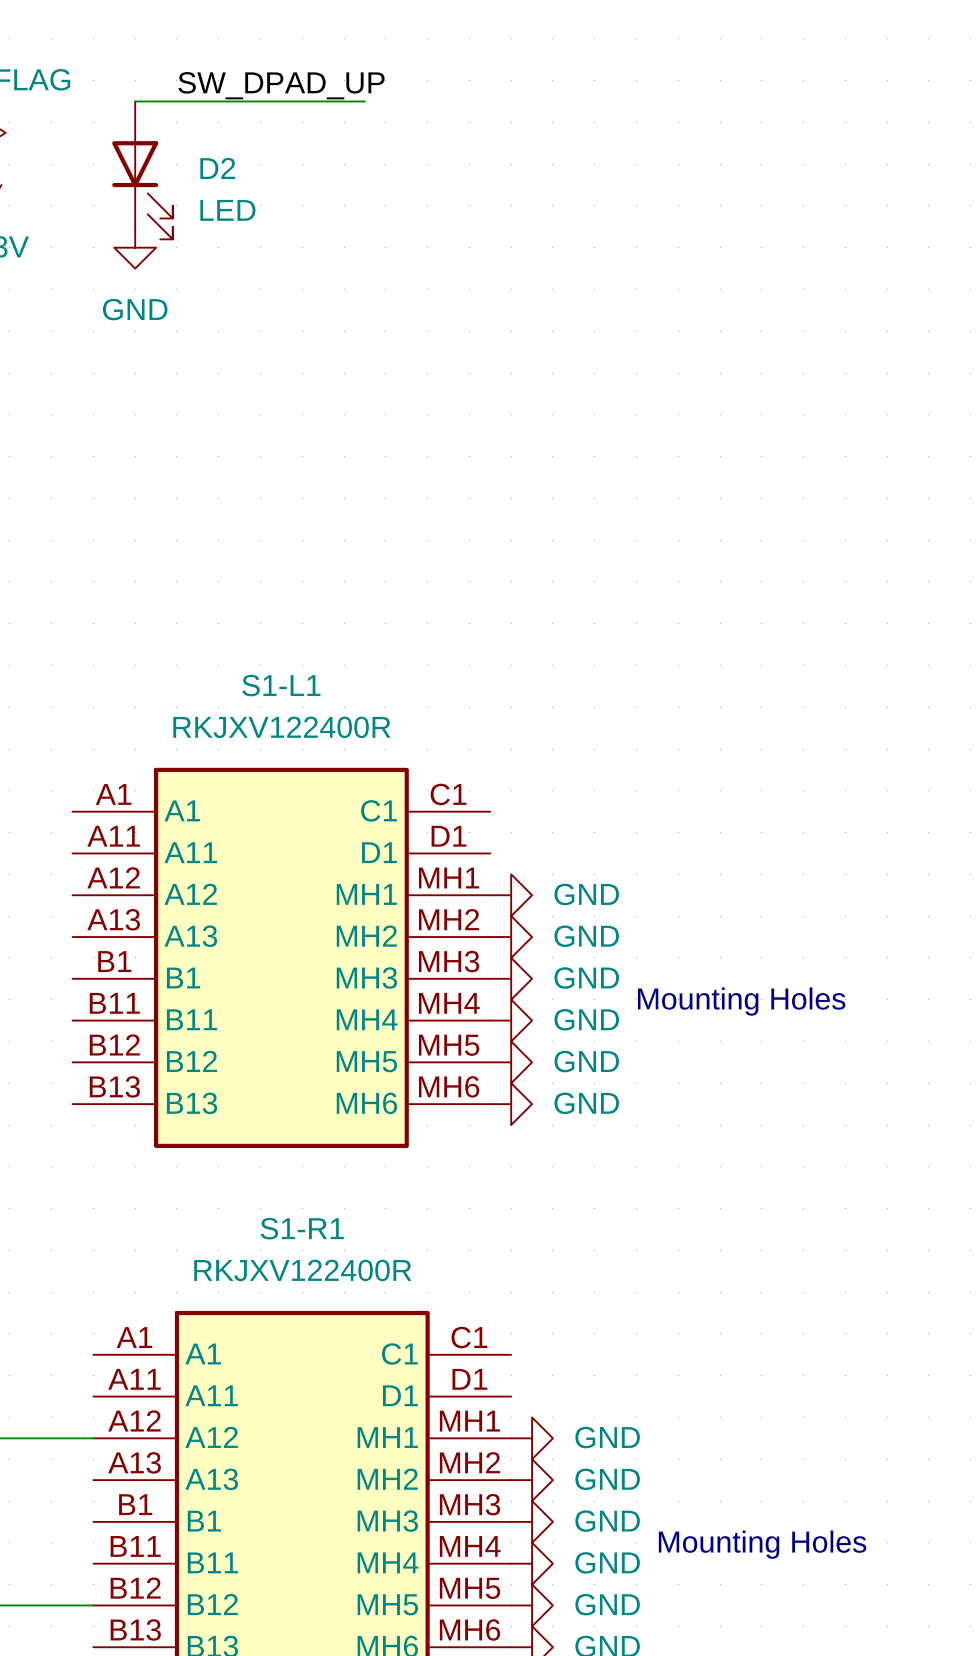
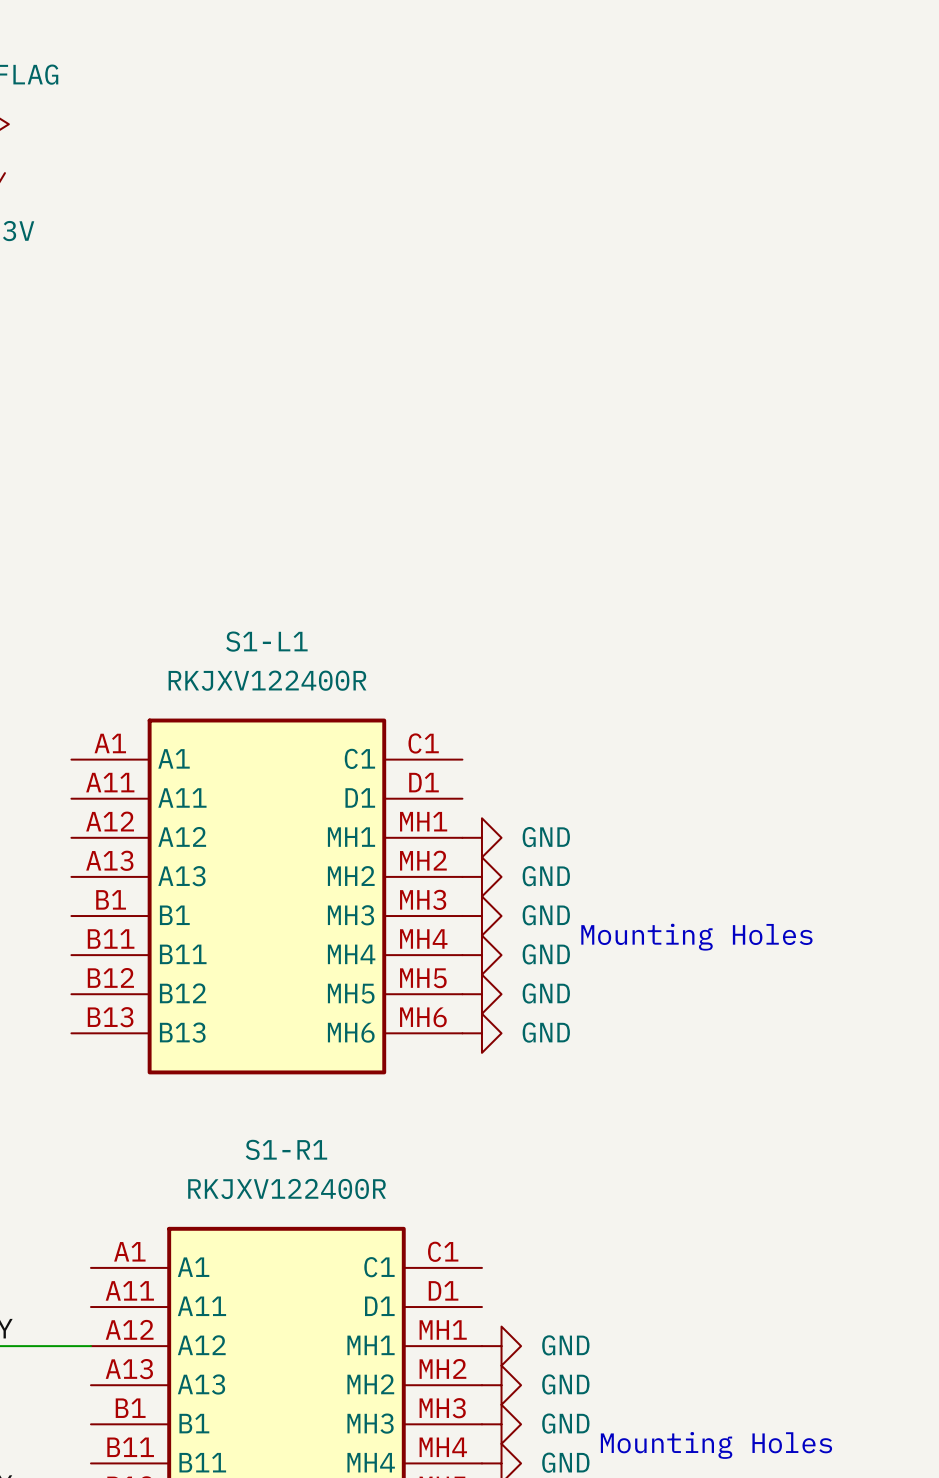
label: SW_DPAD_UP (281, 85) -> none
wire: (135, 101) (364, 101) -> none
D2: LED (142, 170) -> none
power symbol: GND (135, 247) -> none

